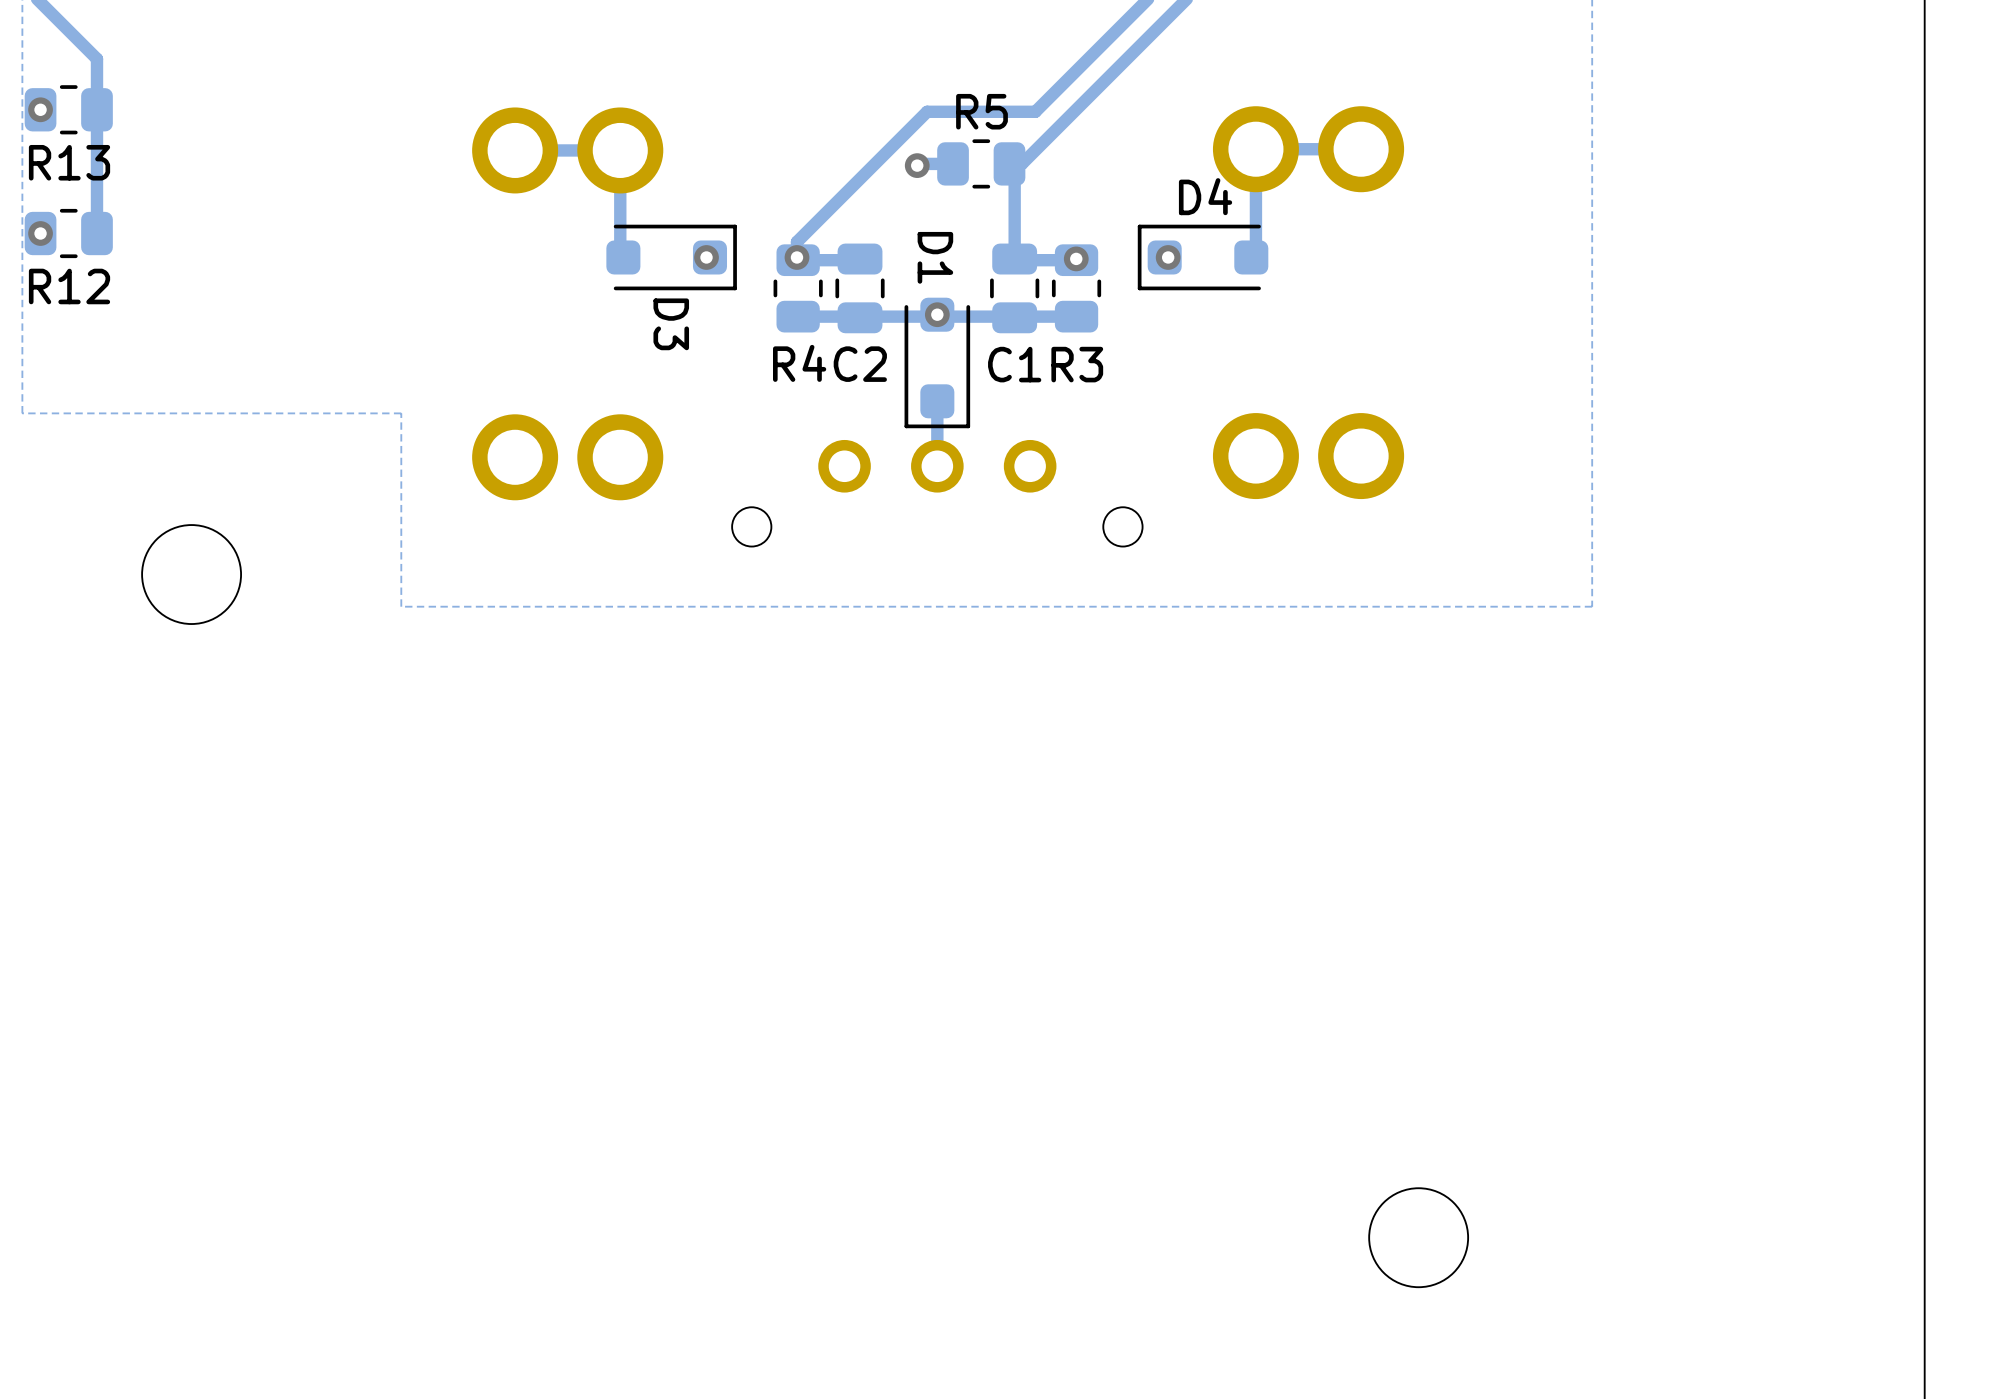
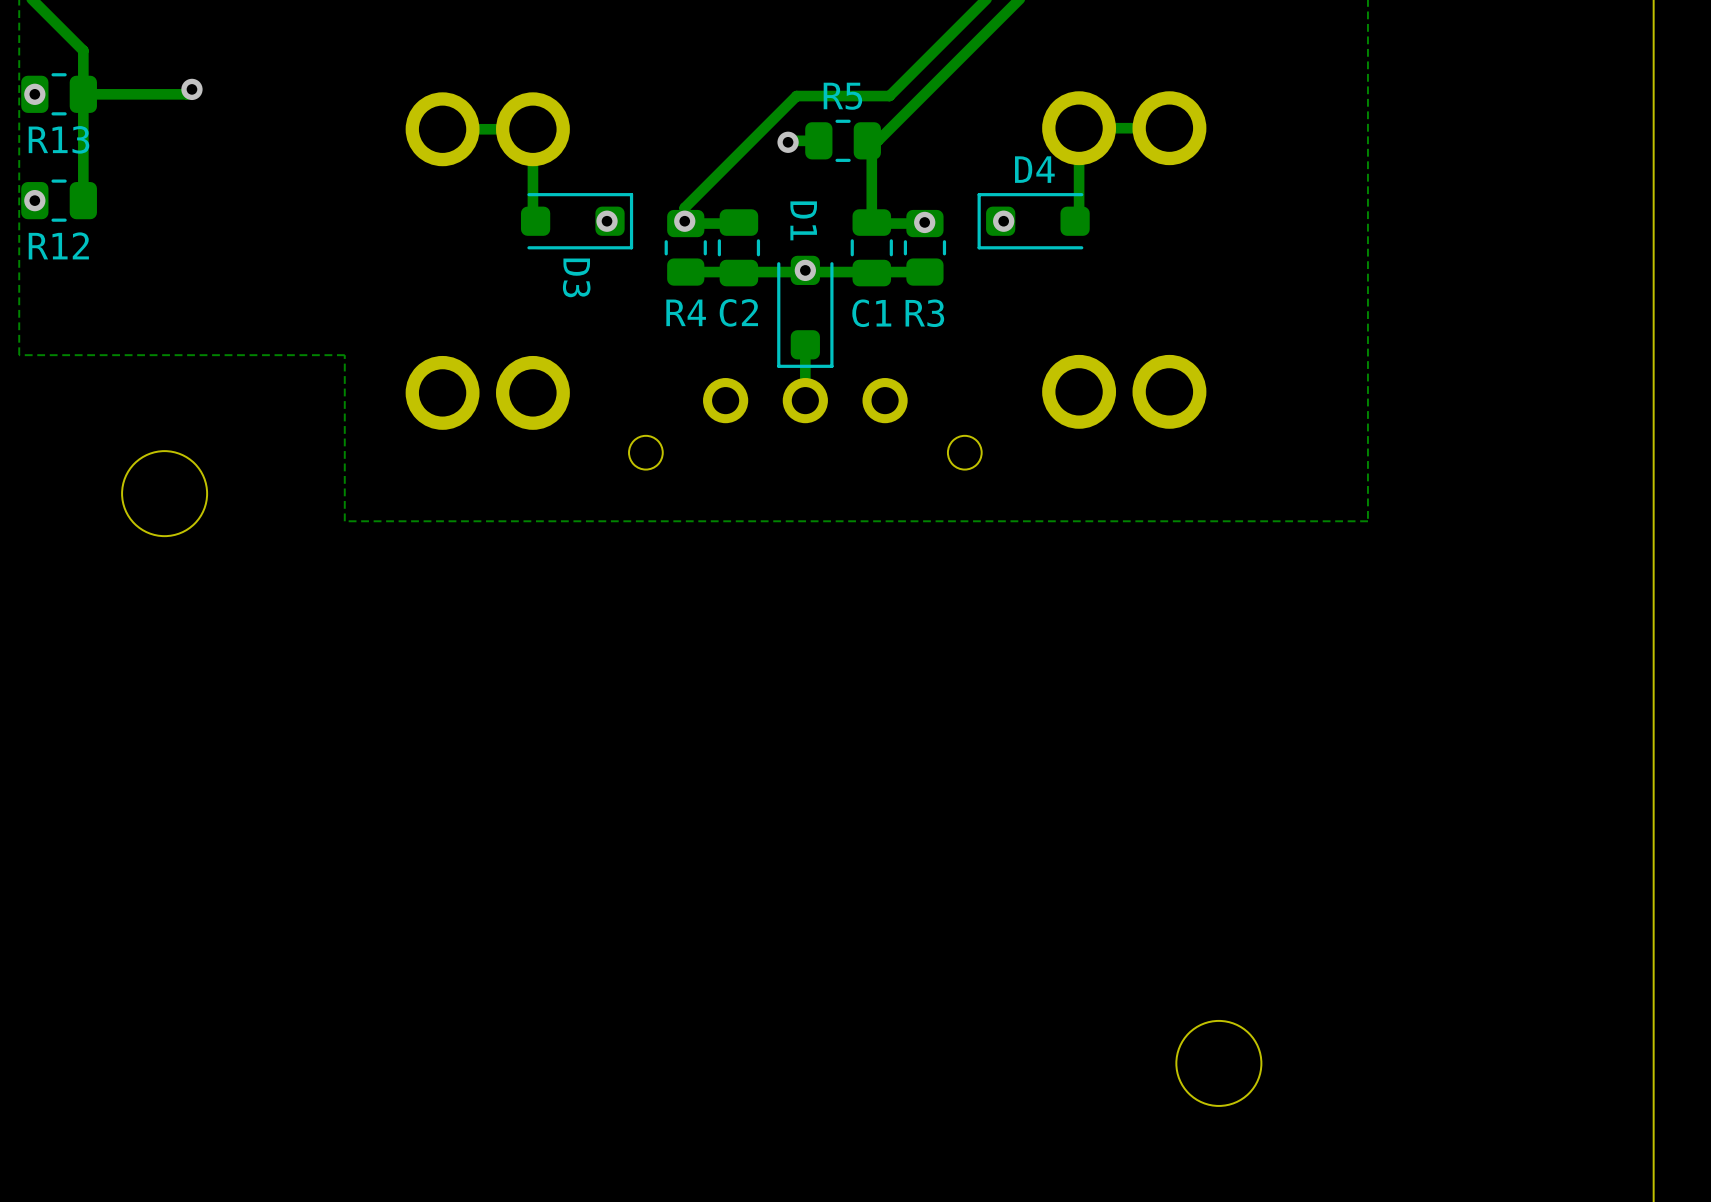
track: none -> (191, 89) (187, 94) (83, 94)
via: none -> (191, 89)

